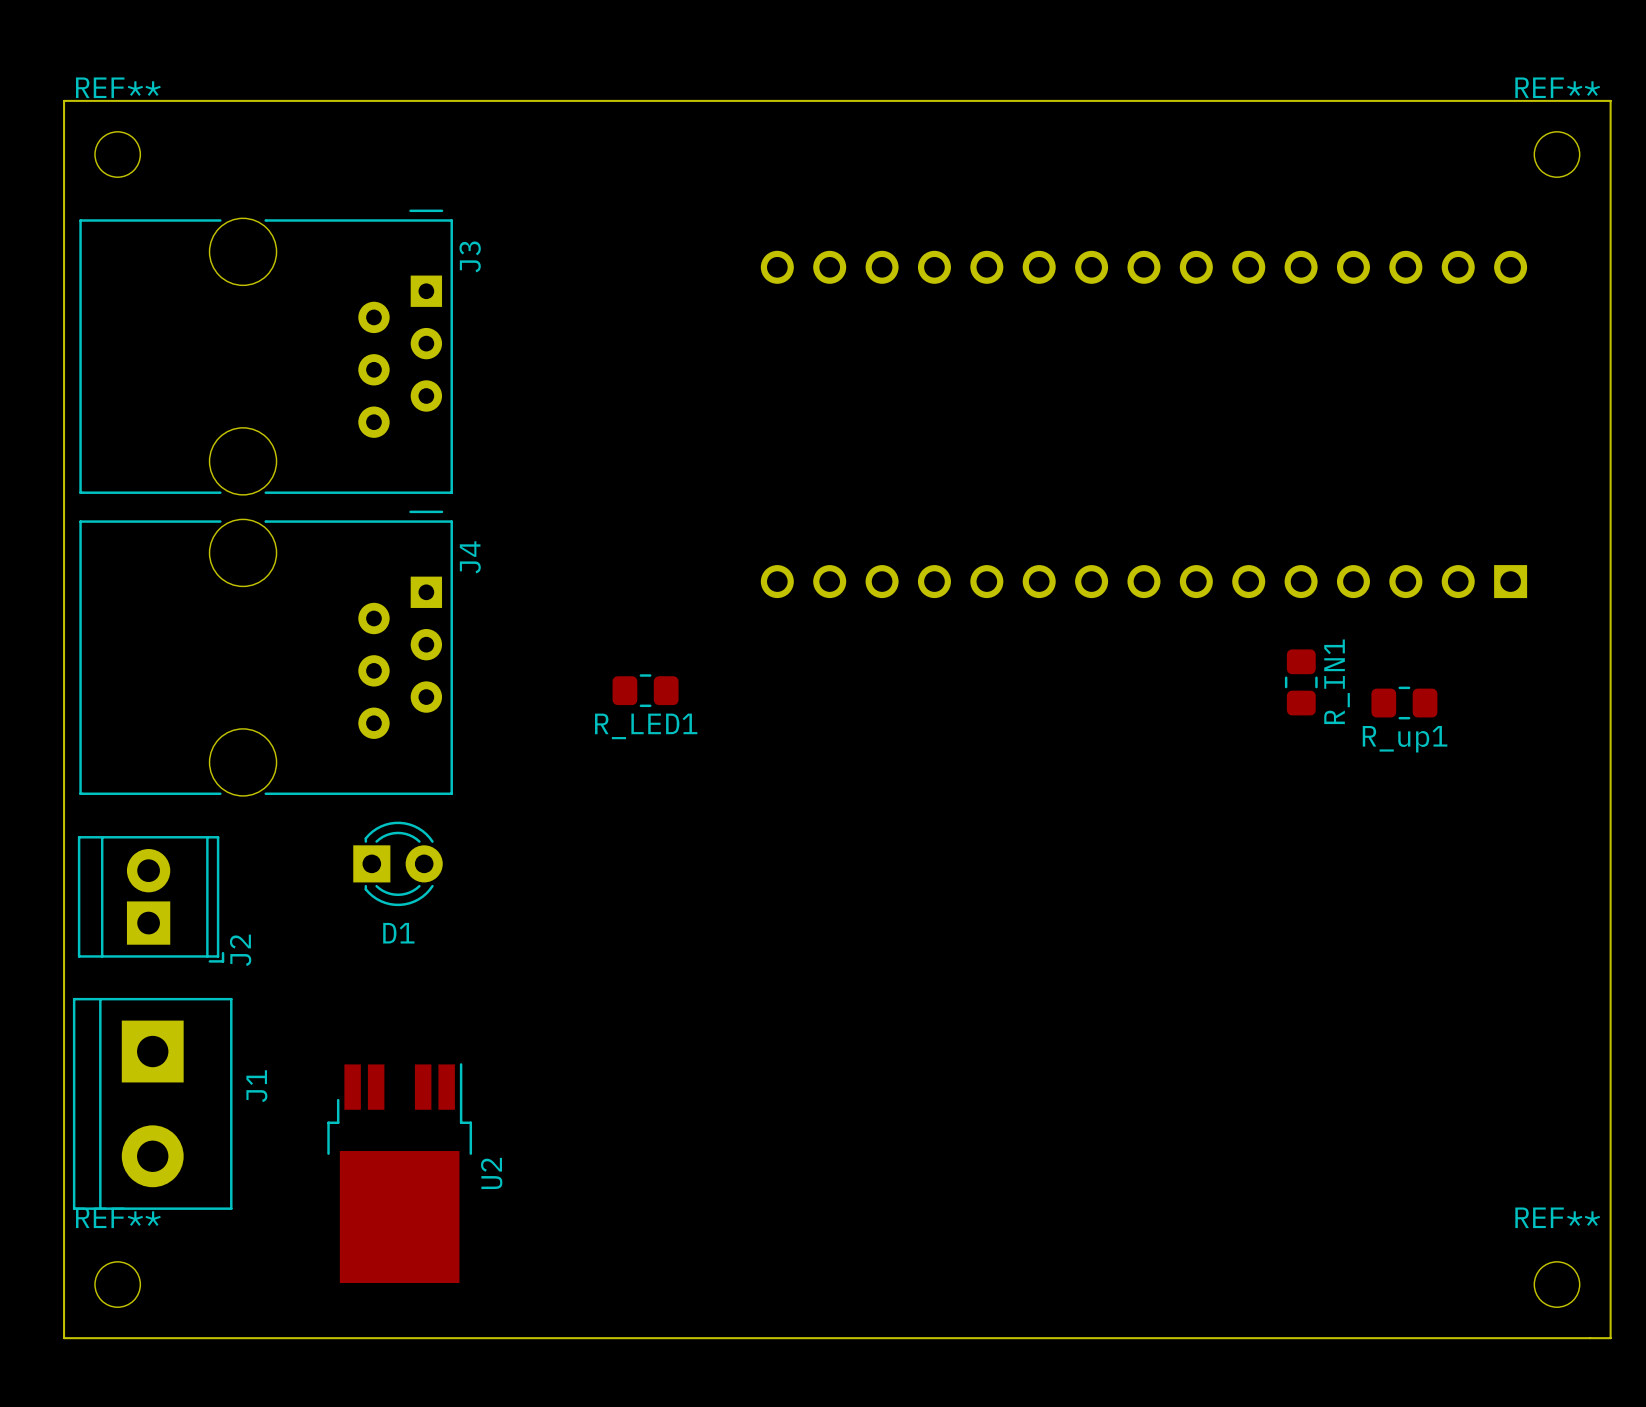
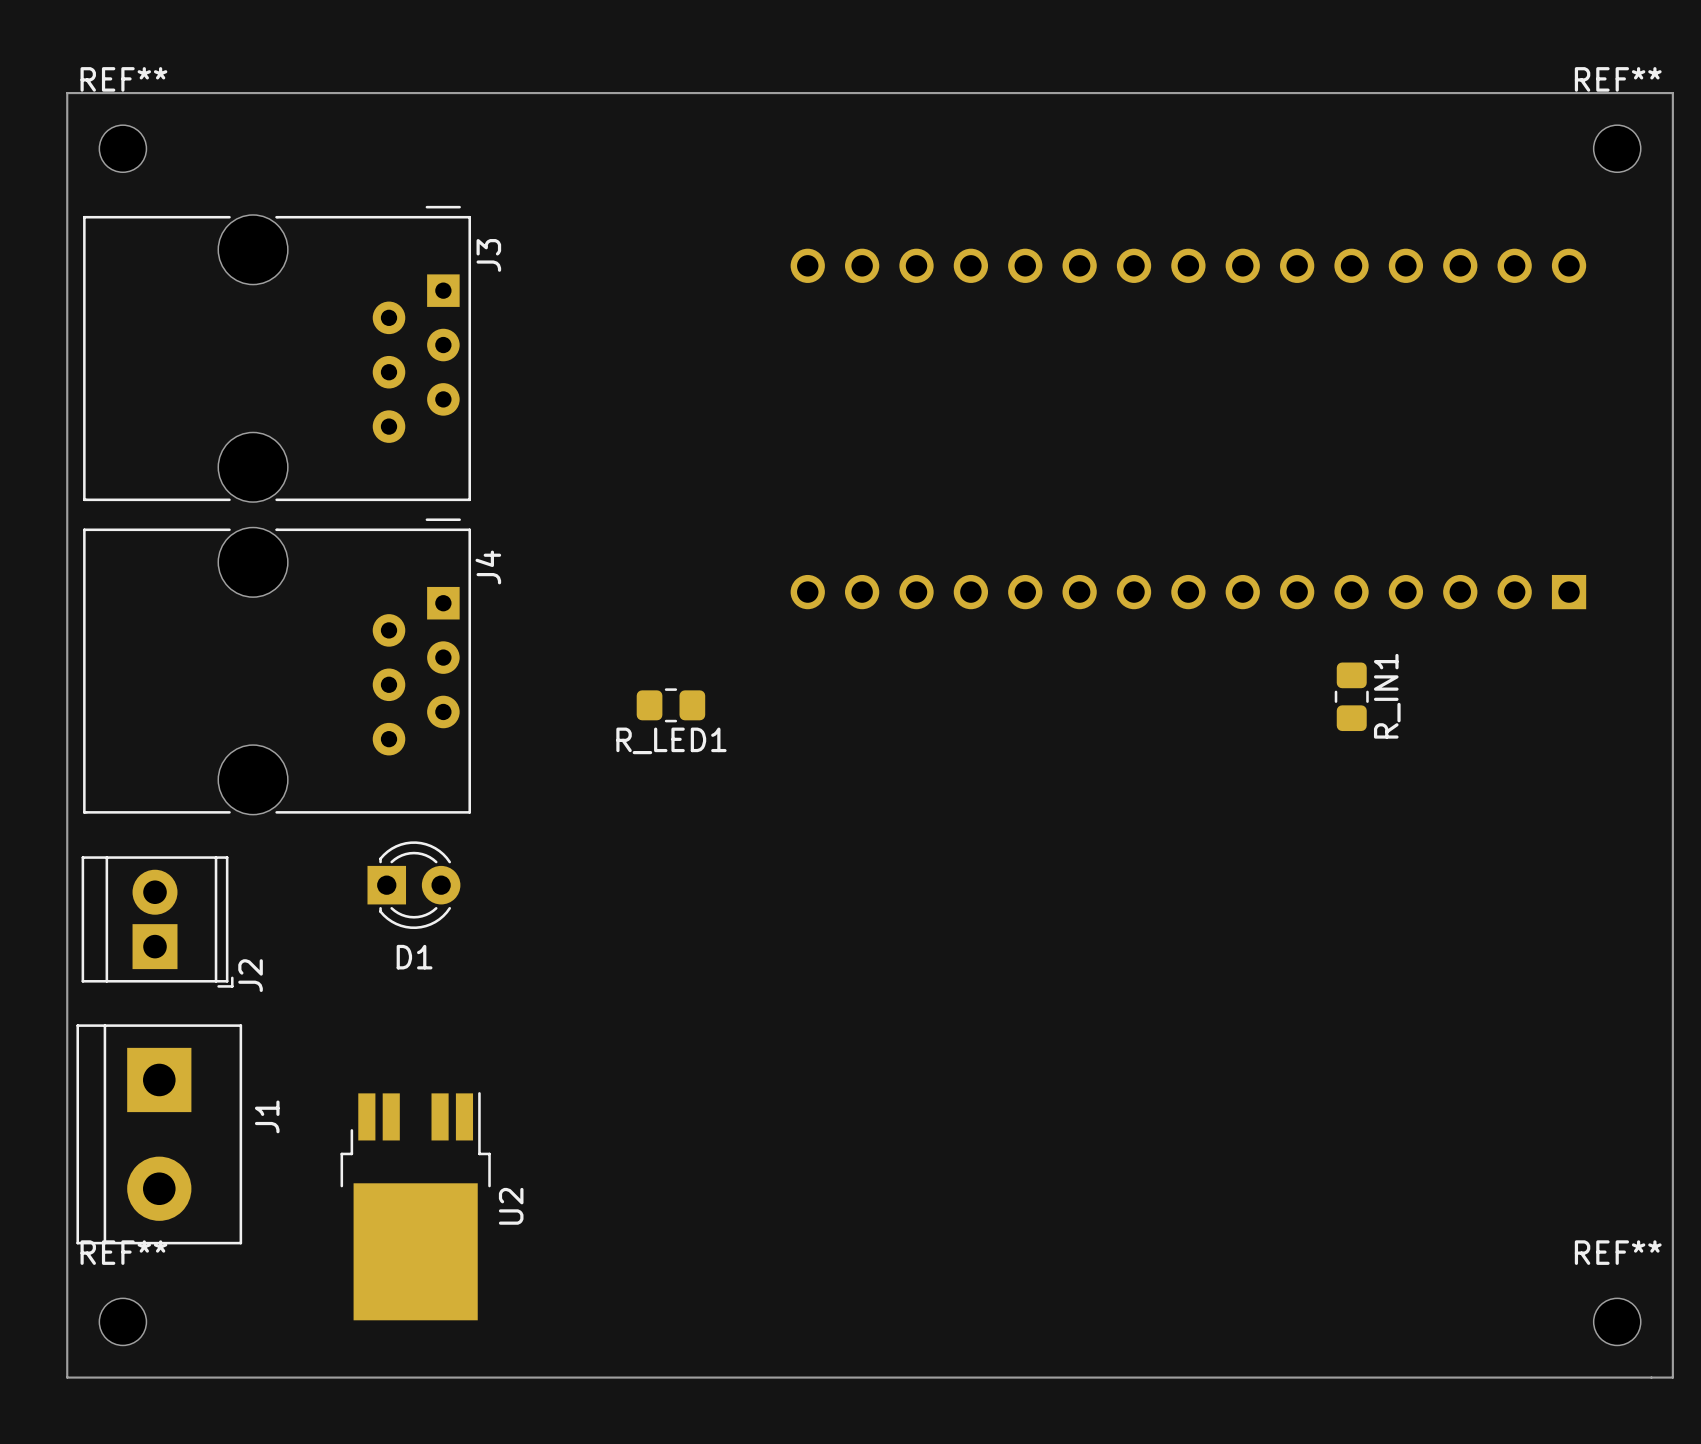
R_up1: (1404, 703) -> none

